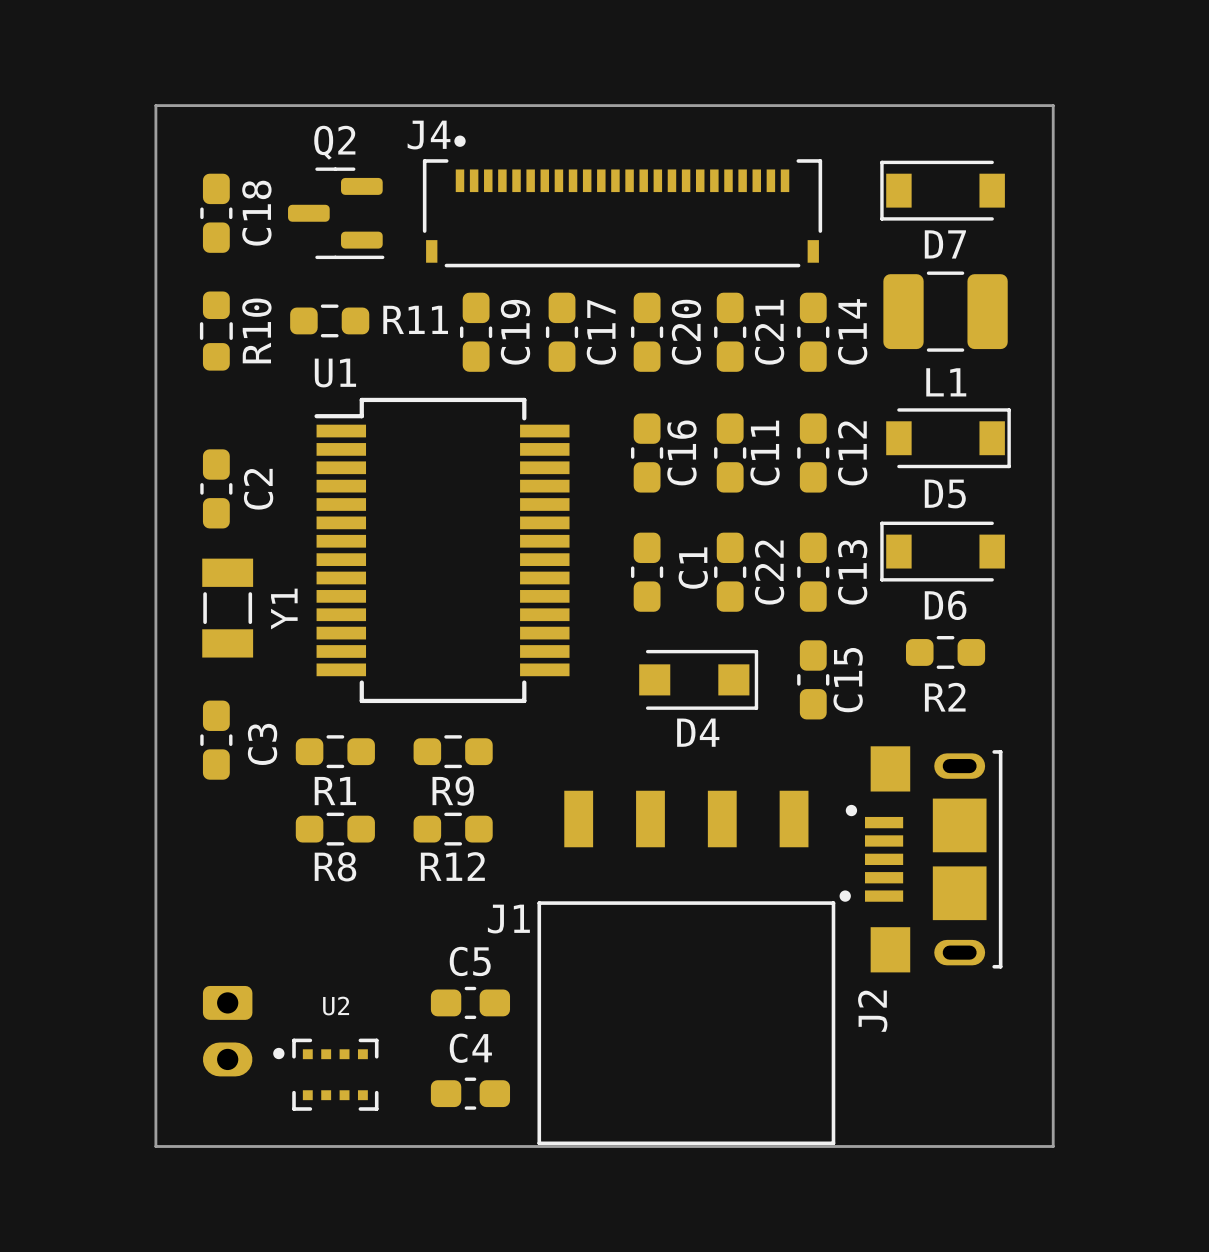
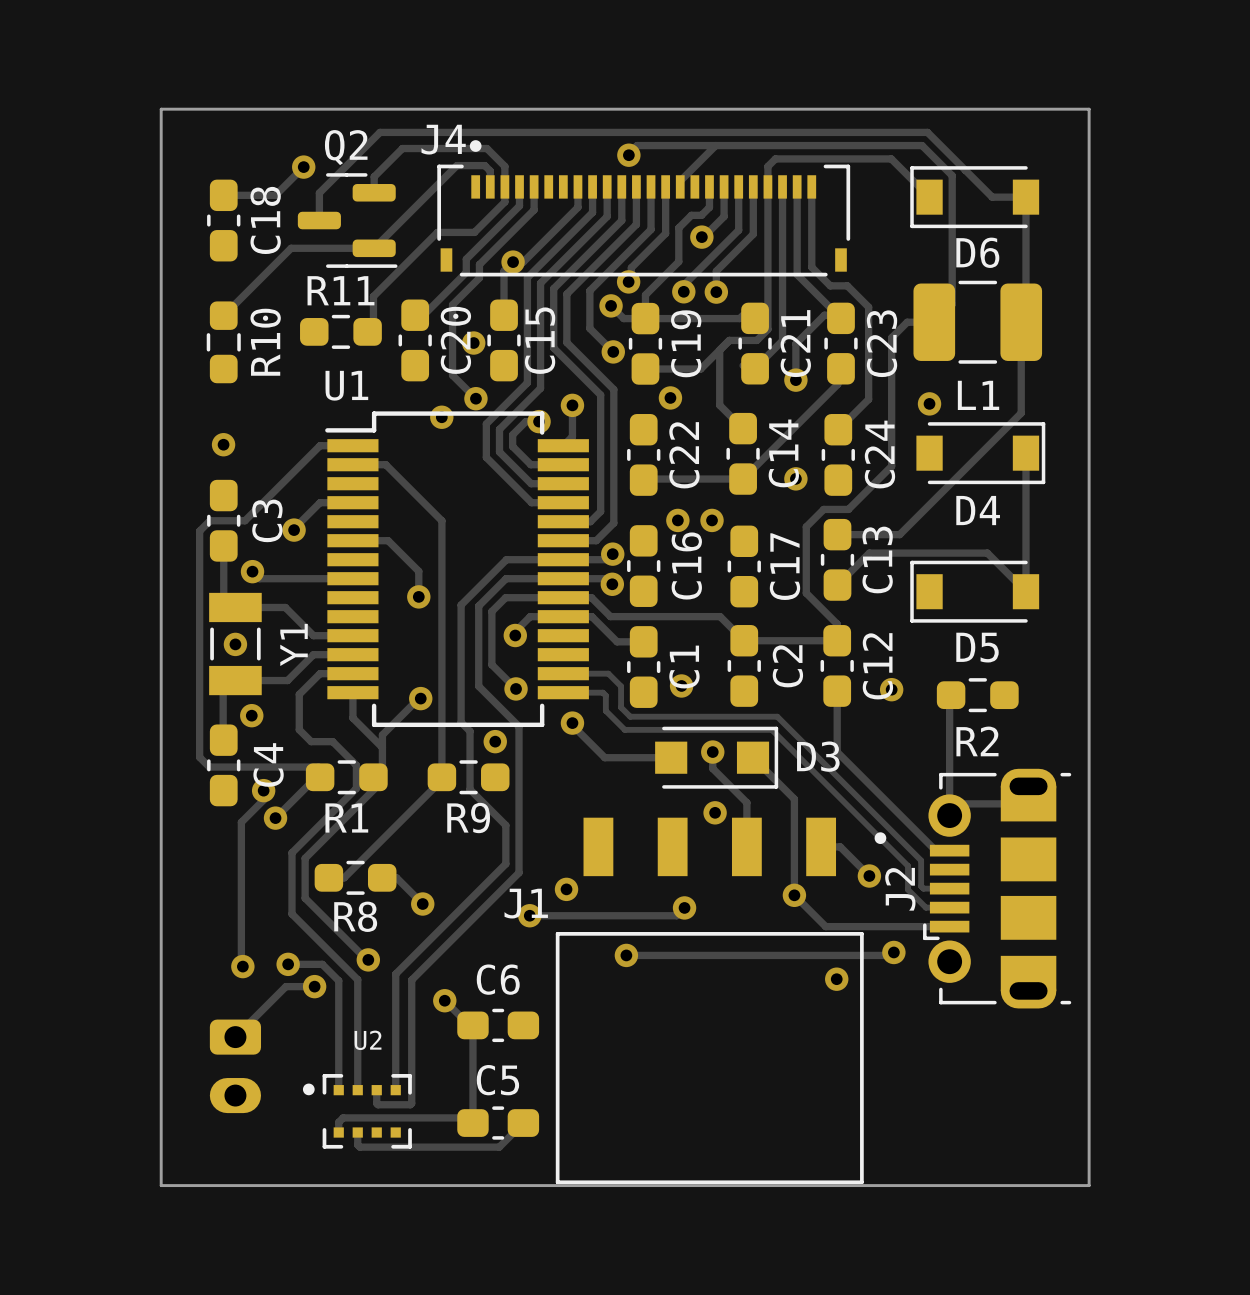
track: none -> (715, 145) (680, 181) (680, 186)
track: none -> (628, 153) (628, 155) (627, 155) (637, 145) (922, 145) (952, 175) (952, 304) (934, 322) (907, 322) (891, 337) (891, 466) (848, 509) (823, 509) (806, 526) (806, 593) (837, 624) (837, 640) (744, 640) (720, 616) (610, 616) (591, 597) (505, 597) (491, 611) (491, 664) (516, 688)
via: none -> (628, 155)
track: none -> (303, 167) (275, 195) (223, 195)
via: none -> (303, 167)
track: none -> (490, 186) (490, 171) (484, 165) (456, 165) (374, 248) (291, 248) (223, 315)
track: none -> (519, 186) (519, 205) (466, 259) (466, 272) (423, 315) (415, 315)
track: none -> (534, 186) (534, 209) (479, 264) (479, 277) (452, 304) (452, 375) (475, 398)
track: none -> (577, 186) (577, 207) (523, 262) (513, 262) (504, 271) (504, 315)
track: none -> (592, 186) (592, 212) (527, 277) (527, 382) (486, 423) (486, 457) (531, 502) (563, 502)
track: none -> (607, 186) (607, 216) (540, 283) (540, 388) (499, 429) (499, 452) (531, 483) (563, 483)
track: none -> (621, 186) (621, 220) (553, 288) (553, 348) (600, 394) (600, 511) (590, 521) (563, 521)
track: none -> (636, 186) (636, 224) (566, 294) (566, 342) (613, 389) (613, 523) (596, 540) (563, 540)
track: none -> (651, 186) (651, 229) (589, 290) (589, 328) (614, 354)
track: none -> (665, 186) (665, 233) (631, 267) (631, 281)
track: none -> (709, 186) (709, 207) (701, 215) (691, 215) (678, 227) (678, 261) (645, 295) (645, 318)
track: none -> (724, 186) (724, 216) (701, 237)
track: none -> (738, 186) (738, 230) (683, 285) (683, 291)
track: none -> (753, 186) (753, 234) (716, 271) (716, 292) (712, 296)
track: none -> (782, 186) (782, 340) (757, 365) (743, 365)
track: none -> (797, 186) (797, 274) (837, 315) (824, 315) (795, 343) (795, 380)
track: none -> (811, 186) (811, 267) (830, 285) (847, 285) (868, 307) (868, 399) (838, 429)
track: none -> (374, 192) (374, 176) (402, 148) (486, 148) (504, 166) (504, 201) (474, 232) (437, 232) (373, 296) (373, 337)
track: none -> (929, 197) (891, 158) (775, 158) (767, 166) (767, 329) (756, 340) (729, 340) (700, 369) (645, 369)
track: none -> (319, 220) (319, 193) (379, 132) (927, 132) (992, 197) (1025, 197) (1025, 317) (1021, 322) (1021, 413) (899, 534) (837, 534)
via: none -> (701, 237)
D7 name: D7 (945, 244) -> D6 (977, 252)
via: none -> (513, 262)
via: none -> (628, 281)
via: none -> (683, 291)
via: none -> (716, 292)
track: none -> (611, 305) (623, 318) (739, 318) (743, 315)
via: none -> (611, 305)
R11 name position: R11 (415, 319) -> R11 (340, 290)
via: none -> (473, 343)
C14 name: C14 (852, 331) -> C23 (882, 343)
C19 position: (476, 332) -> (645, 343)
C17 position: (562, 332) -> (744, 566)
C20 position: (647, 332) -> (415, 340)
track: none -> (719, 350) (719, 405) (743, 428)
via: none -> (613, 351)
track: none -> (837, 365) (837, 384) (743, 479) (643, 480)
via: none -> (795, 380)
via: none -> (670, 397)
via: none -> (475, 398)
via: none -> (929, 403)
track: none -> (572, 405) (572, 436) (563, 445)
via: none -> (572, 405)
via: none -> (441, 417)
via: none -> (539, 421)
track: none -> (544, 421) (525, 421) (512, 434) (512, 446) (530, 464) (563, 464)
via: none -> (223, 444)
track: none -> (352, 445) (320, 445) (245, 520) (210, 520) (199, 531) (199, 757) (209, 767) (318, 767) (328, 777) (316, 777) (275, 818)
track: none -> (1025, 453) (1025, 591) (987, 553) (869, 553) (837, 585)
C24: none -> (838, 454)
track: none -> (352, 464) (385, 464) (441, 520) (441, 780) (344, 877) (328, 877)
C16 name position: C16 (681, 452) -> C16 (686, 565)
C16 position: (647, 453) -> (643, 566)
C11 position: (730, 453) -> (743, 453)
C11 name: C11 (765, 453) -> C14 (783, 453)
C12 position: (813, 453) -> (837, 665)
via: none -> (795, 478)
track: none -> (352, 502) (320, 502) (294, 528)
C2 position: (216, 488) -> (744, 665)
D5 name: D5 (945, 493) -> D4 (978, 510)
C3: none -> (223, 520)
via: none -> (677, 520)
via: none -> (712, 520)
via: none -> (294, 530)
track: none -> (352, 540) (388, 540) (418, 571) (418, 596)
track: none -> (223, 545) (223, 595) (235, 607) (285, 607) (313, 635) (352, 635)
track: none -> (612, 554) (613, 559) (506, 559) (461, 605) (461, 722) (470, 731) (470, 789) (505, 825) (505, 863) (395, 974) (395, 1090)
via: none -> (612, 554)
part: none -> (837, 559)
text: none -> C13 (877, 559)
D6 position: (942, 551) -> (974, 591)
track: none -> (252, 571) (259, 578) (352, 578)
via: none -> (252, 571)
track: none -> (609, 583) (612, 584) (606, 578) (506, 578) (478, 606) (478, 686) (519, 726) (519, 872) (411, 980) (411, 1103) (378, 1104) (376, 1090)
via: none -> (612, 584)
C1 name position: C1 (693, 568) -> C1 (684, 667)
C1 position: (647, 572) -> (643, 667)
C22 position: (730, 572) -> (643, 454)
C13: (813, 572) -> none
via: none -> (418, 596)
D6 name: D6 (945, 605) -> D5 (977, 647)
Y1 position: (227, 608) -> (235, 644)
track: none -> (515, 635) (515, 631) (530, 616) (591, 616) (617, 641) (643, 641)
via: none -> (515, 635)
via: none -> (235, 644)
track: none -> (352, 654) (313, 654) (287, 680) (235, 680) (223, 692) (223, 741)
track: none -> (352, 673) (320, 673) (299, 694) (299, 729) (311, 741) (332, 741) (356, 765) (356, 788) (291, 852) (291, 914) (357, 979) (357, 1090)
R2 position: (945, 652) -> (977, 695)
track: none -> (567, 676) (563, 673) (608, 673) (621, 686) (621, 707) (630, 716) (777, 716) (921, 860) (921, 886) (923, 888) (949, 888)
via: none -> (681, 685)
via: none -> (516, 688)
via: none -> (891, 689)
track: none -> (567, 689) (563, 692) (602, 692) (605, 695) (605, 710) (624, 729) (771, 729) (907, 865) (907, 889) (925, 907) (949, 907)
track: none -> (837, 691) (837, 752) (935, 850) (949, 850)
track: none -> (352, 692) (352, 718) (382, 747)
track: none -> (951, 695) (949, 815) (961, 803) (1028, 803)
track: none -> (420, 698) (382, 734) (382, 777)
via: none -> (420, 698)
D4: (698, 679) -> none
C15 position: (813, 679) -> (504, 340)
via: none -> (251, 715)
via: none -> (572, 723)
track: none -> (571, 724) (570, 723) (572, 723) (572, 725) (604, 757) (671, 757)
via: none -> (495, 741)
track: none -> (712, 752) (712, 768) (746, 802) (746, 846)
via: none -> (712, 752)
D3: none -> (716, 757)
track: none -> (753, 757) (794, 799) (794, 895) (825, 926) (949, 926)
C3 name: C3 (262, 744) -> C4 (268, 764)
J2 footprint: [839, 746, 1003, 973] -> [923, 768, 1072, 1009]
track: none -> (382, 777) (382, 781) (305, 858) (305, 898) (367, 960)
track: none -> (263, 790) (263, 800) (241, 822) (242, 966)
via: none -> (263, 790)
via: none -> (715, 812)
via: none -> (275, 818)
track: none -> (821, 846) (840, 846) (869, 876)
R8 position: (335, 829) -> (355, 877)
R12: (453, 829) -> none
via: none -> (869, 876)
track: none -> (382, 877) (396, 877) (422, 904)
via: none -> (566, 889)
via: none -> (794, 895)
via: none -> (422, 904)
track: none -> (684, 907) (676, 915) (529, 915)
via: none -> (684, 907)
via: none -> (529, 915)
J1 name position: J1 (508, 919) -> J1 (526, 903)
track: none -> (893, 952) (890, 955) (626, 955)
via: none -> (893, 952)
via: none -> (626, 955)
via: none -> (368, 959)
track: none -> (288, 964) (322, 964) (338, 980) (338, 1090)
via: none -> (288, 964)
via: none -> (242, 966)
via: none -> (836, 979)
track: none -> (314, 986) (285, 986) (235, 1037)
via: none -> (314, 986)
track: none -> (444, 1000) (469, 1025) (472, 1025) (472, 1123) (467, 1117) (343, 1117) (338, 1122) (338, 1132)
via: none -> (444, 1000)
C6: none -> (498, 1025)
C5 position: (470, 1002) -> (498, 1123)
J2 name position: J2 (872, 1011) -> J2 (900, 889)
U2 position: (325, 1074) -> (357, 1111)
track: none -> (523, 1123) (499, 1147) (359, 1147) (357, 1144) (357, 1132)
C4: (470, 1093) -> none

